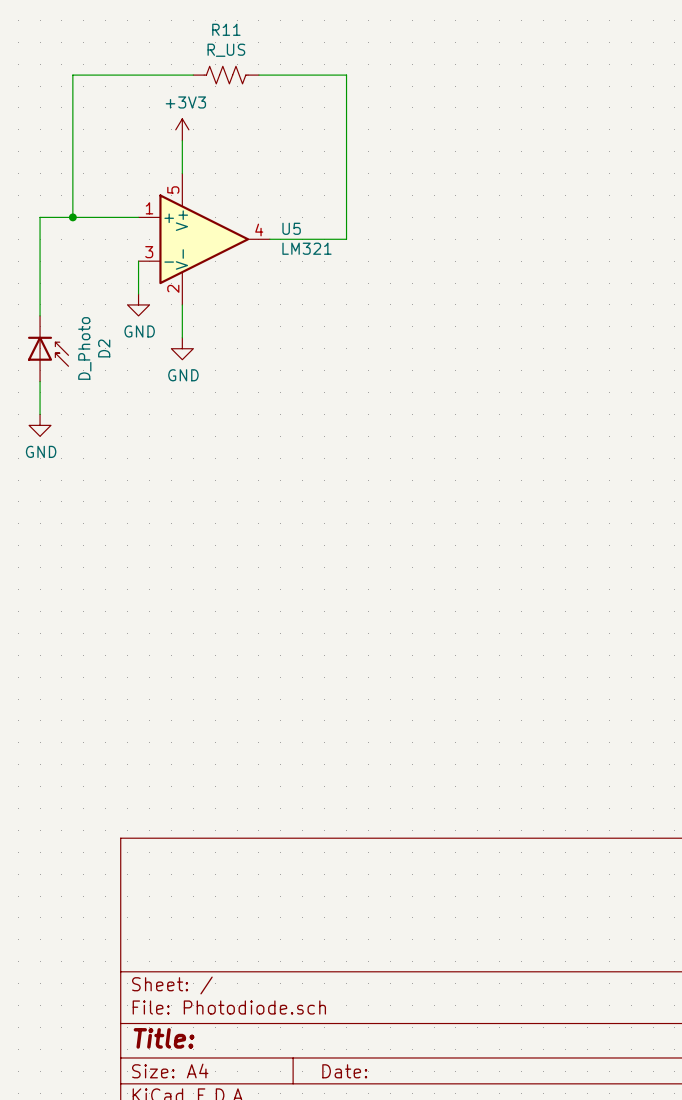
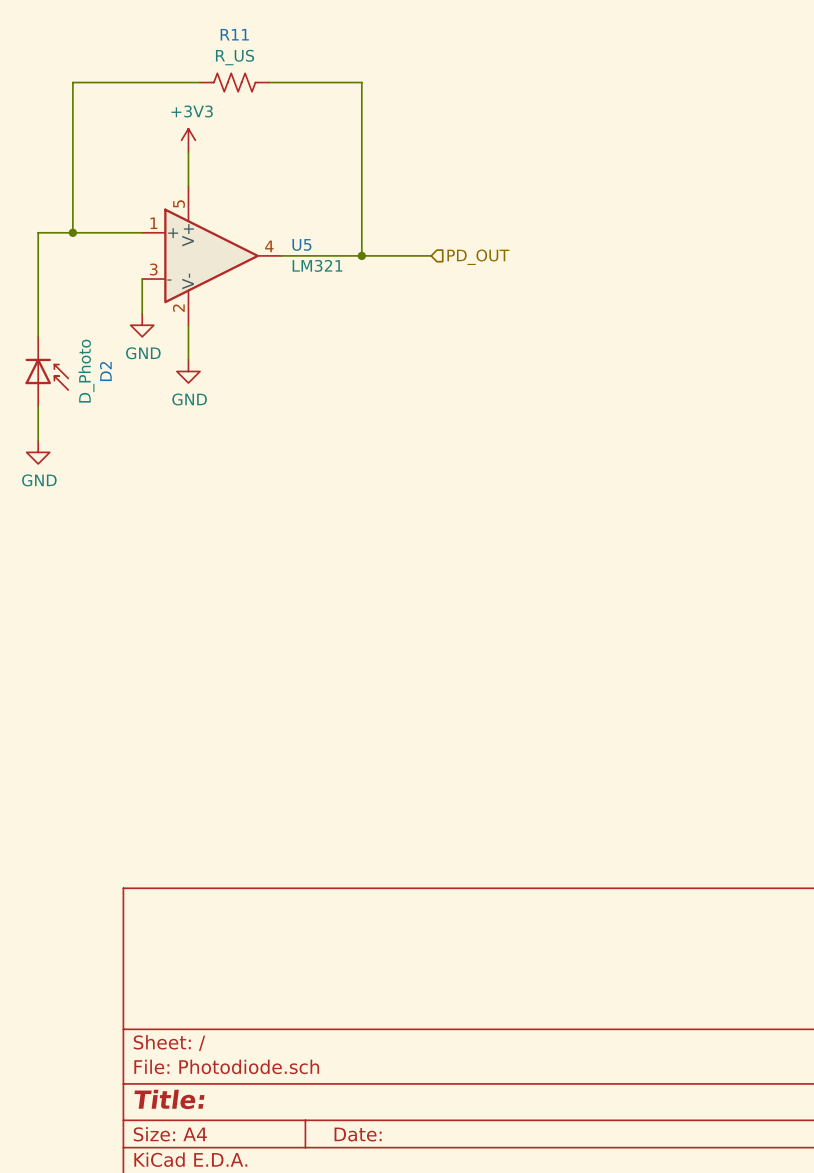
wire: none -> (361, 255) (431, 255)
junction: none -> (361, 255)
hierarchical label: none -> PD_OUT (478, 257)

